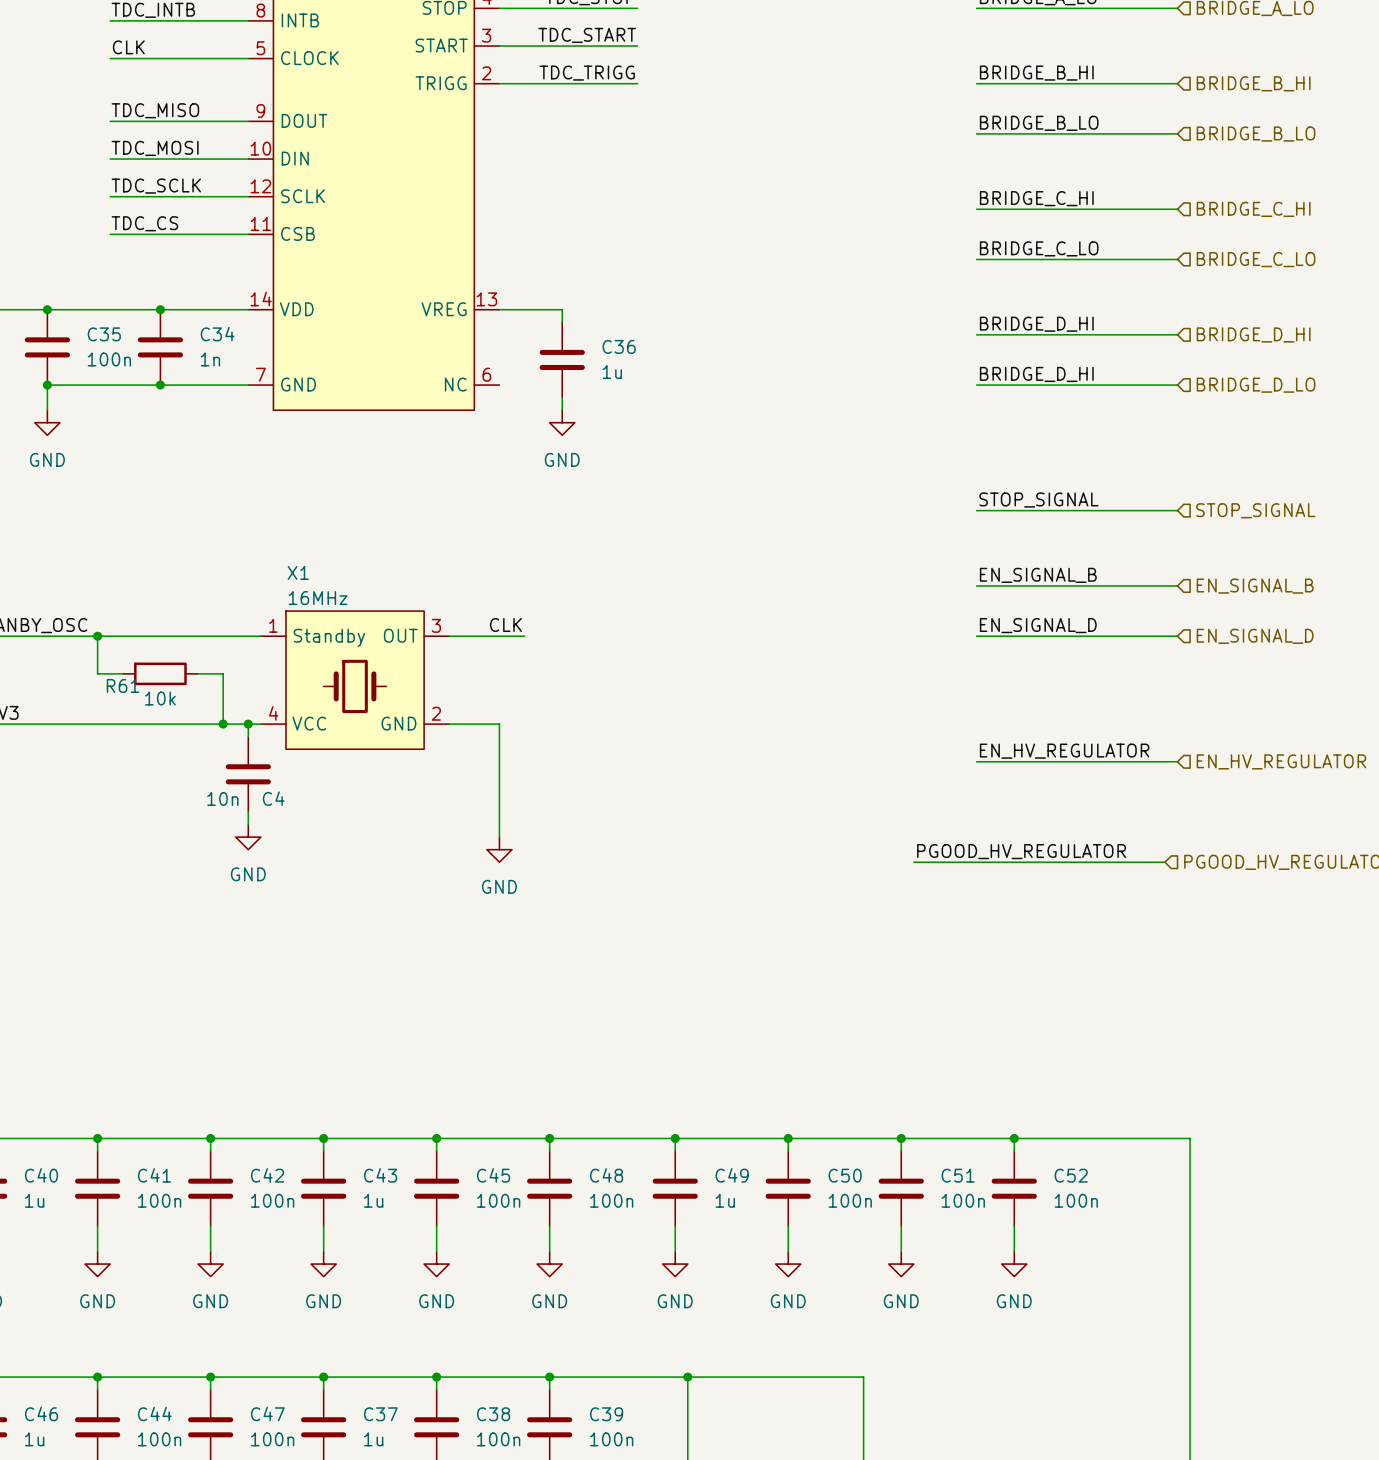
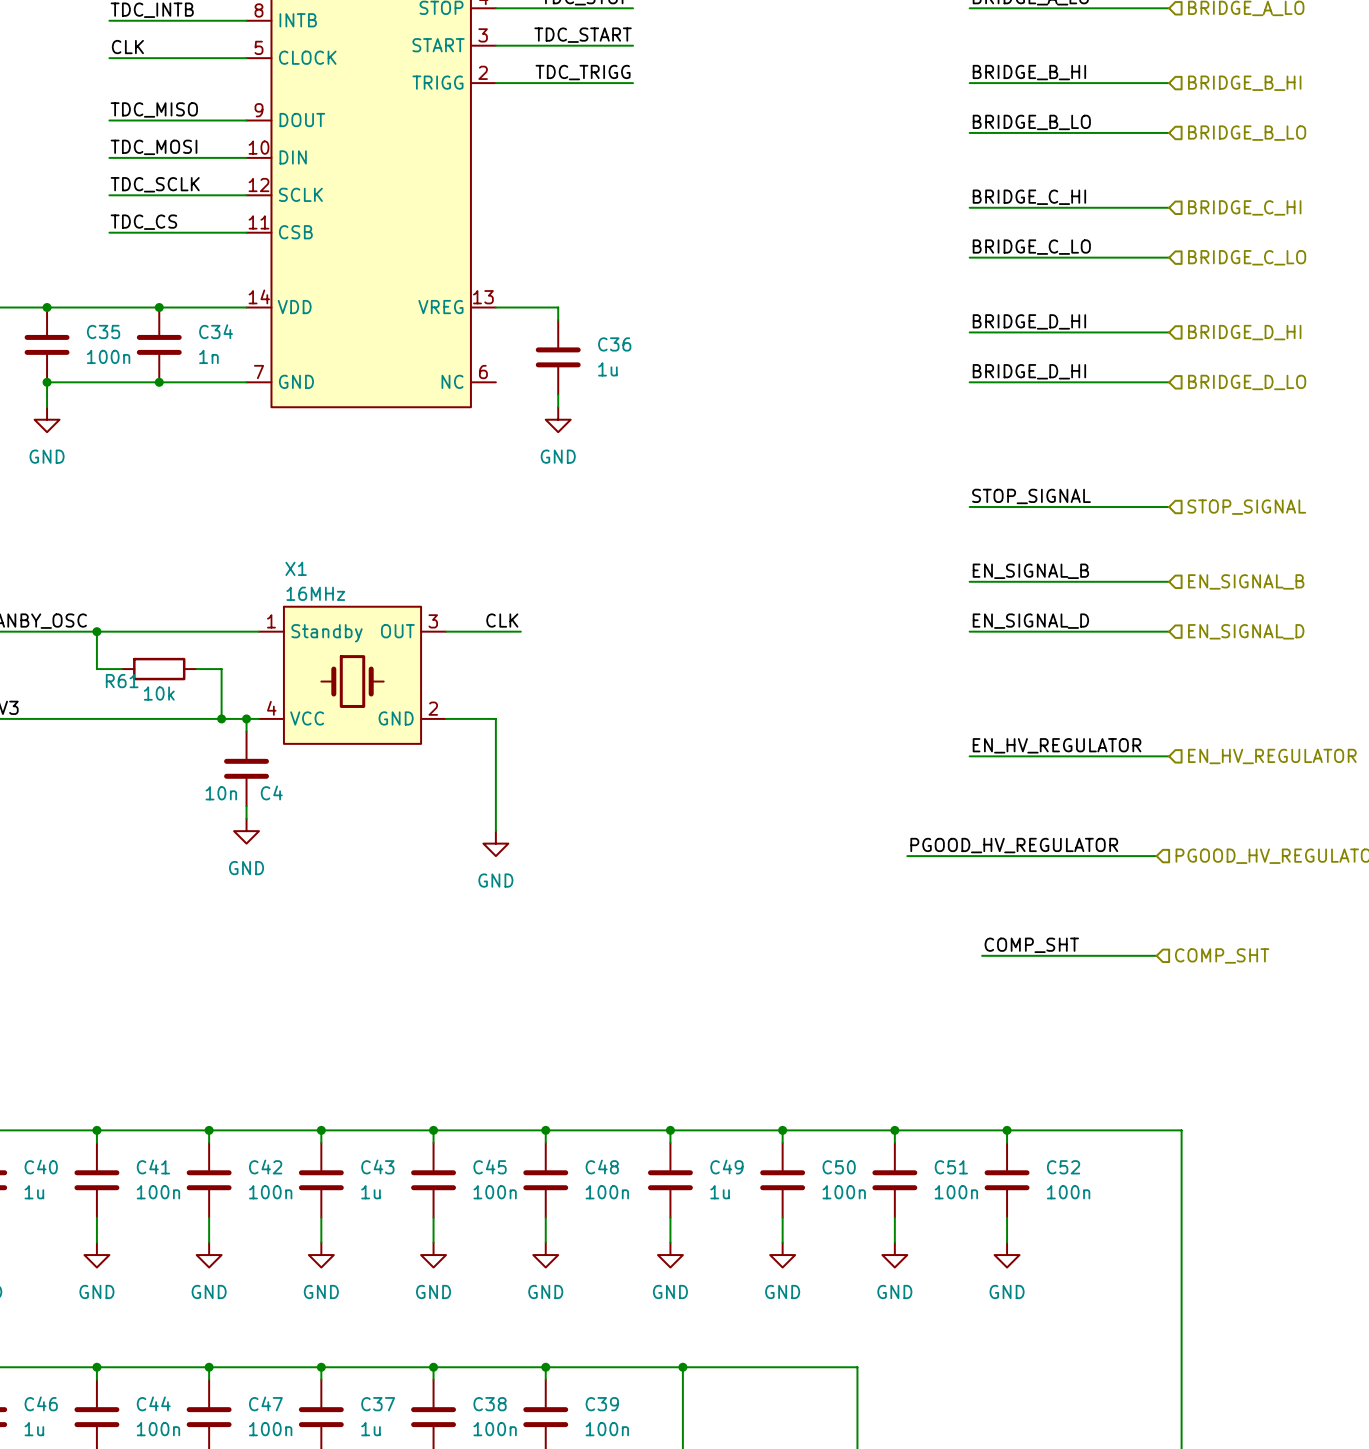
label: none -> COMP_SHT (1031, 945)
wire: none -> (982, 955) (1156, 955)
hierarchical label: none -> COMP_SHT (1222, 955)

